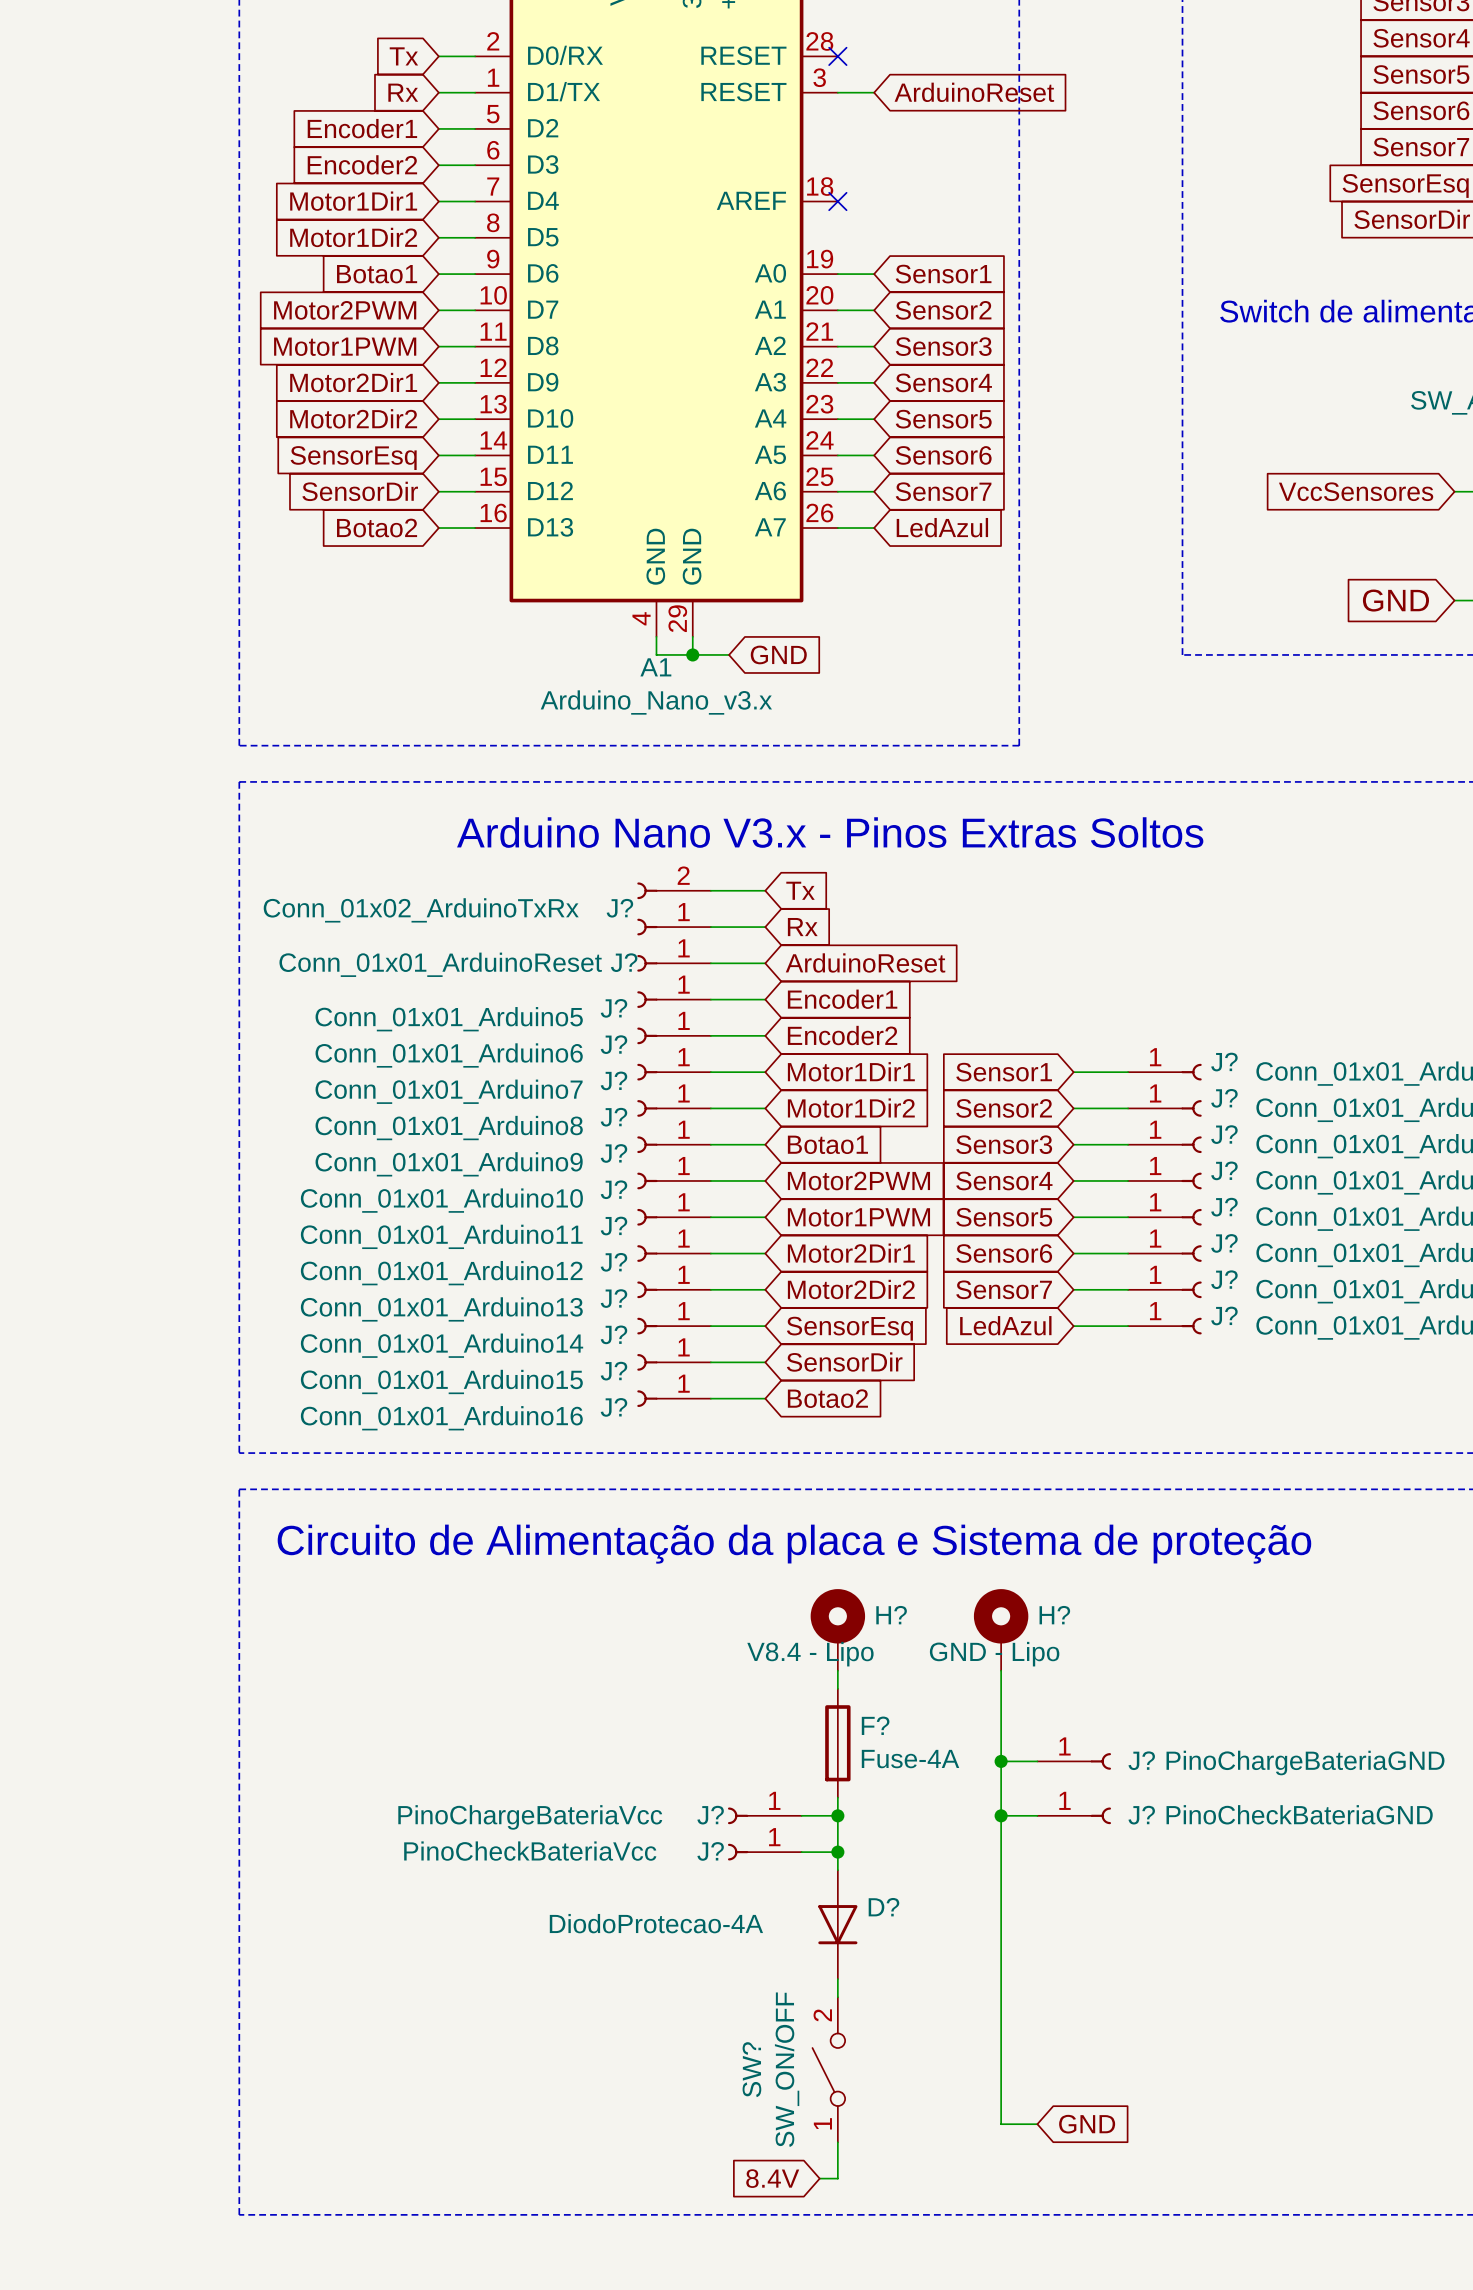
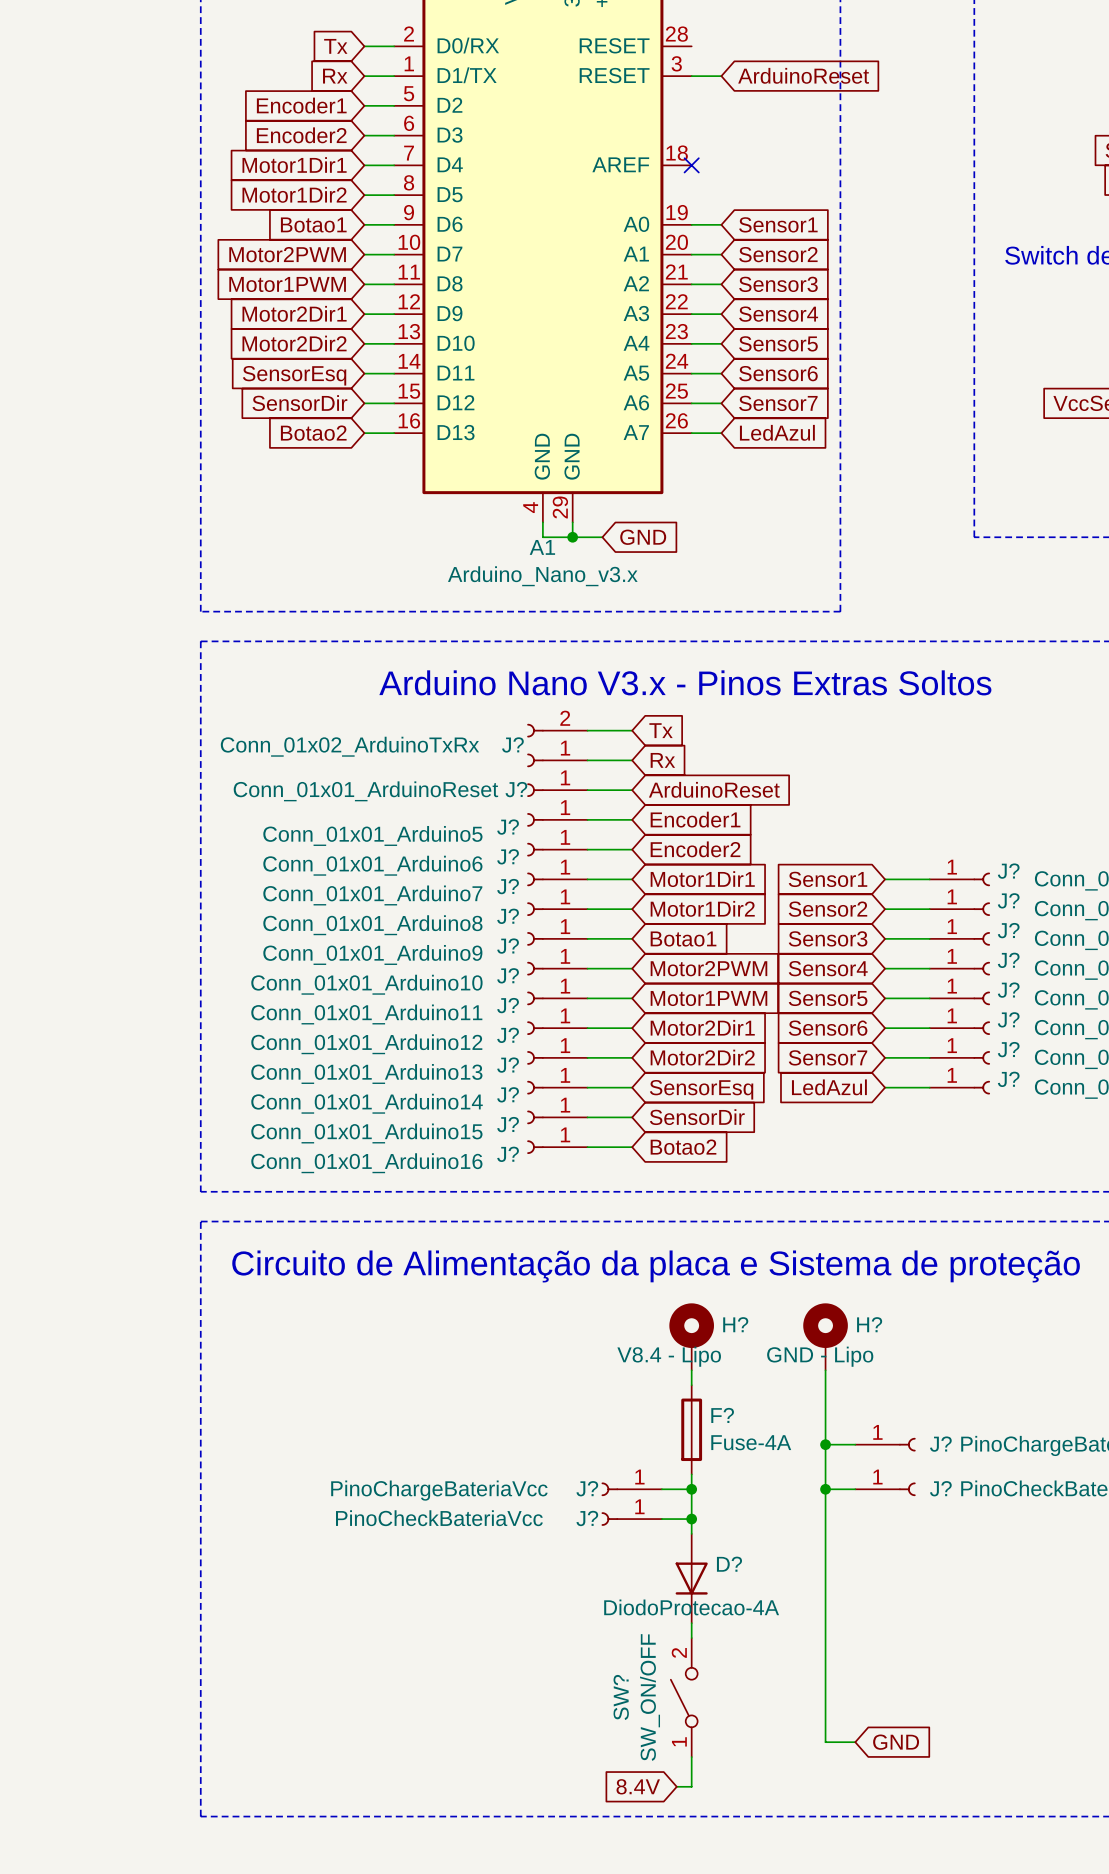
no-connect mark: (837, 56) -> none
D? value position: DiodoProtecao-4A (656, 1923) -> DiodoProtecao-4A (691, 1607)

